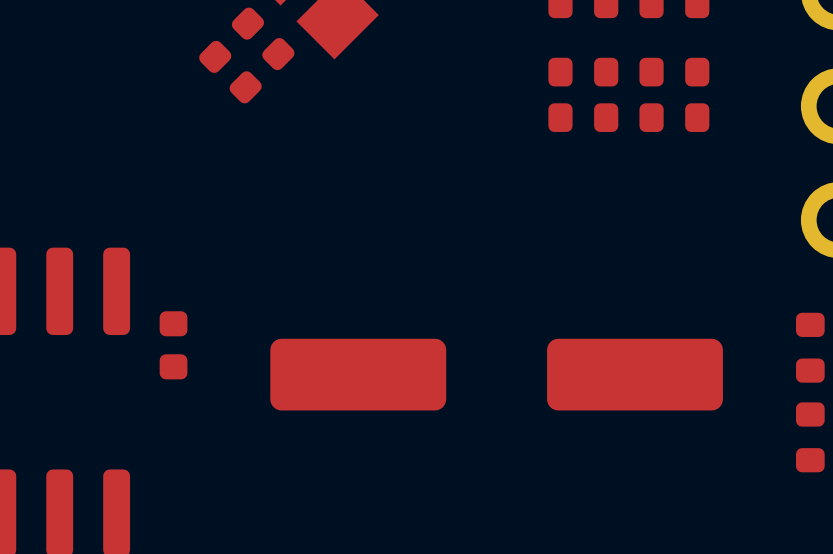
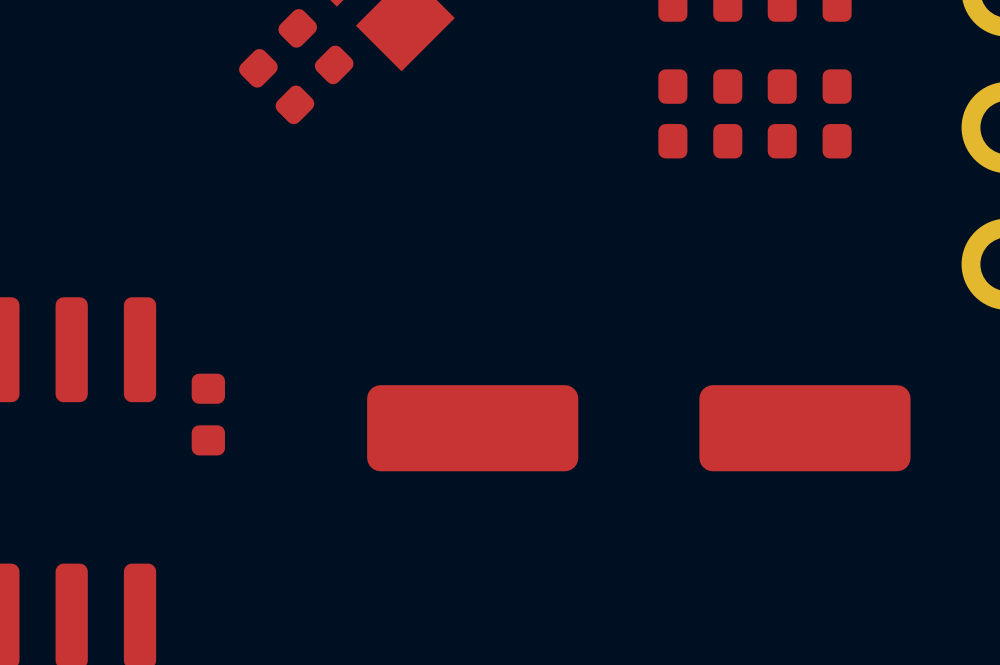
part: (810, 347) -> none
part position: (496, 374) -> (638, 428)
part: (810, 437) -> none

